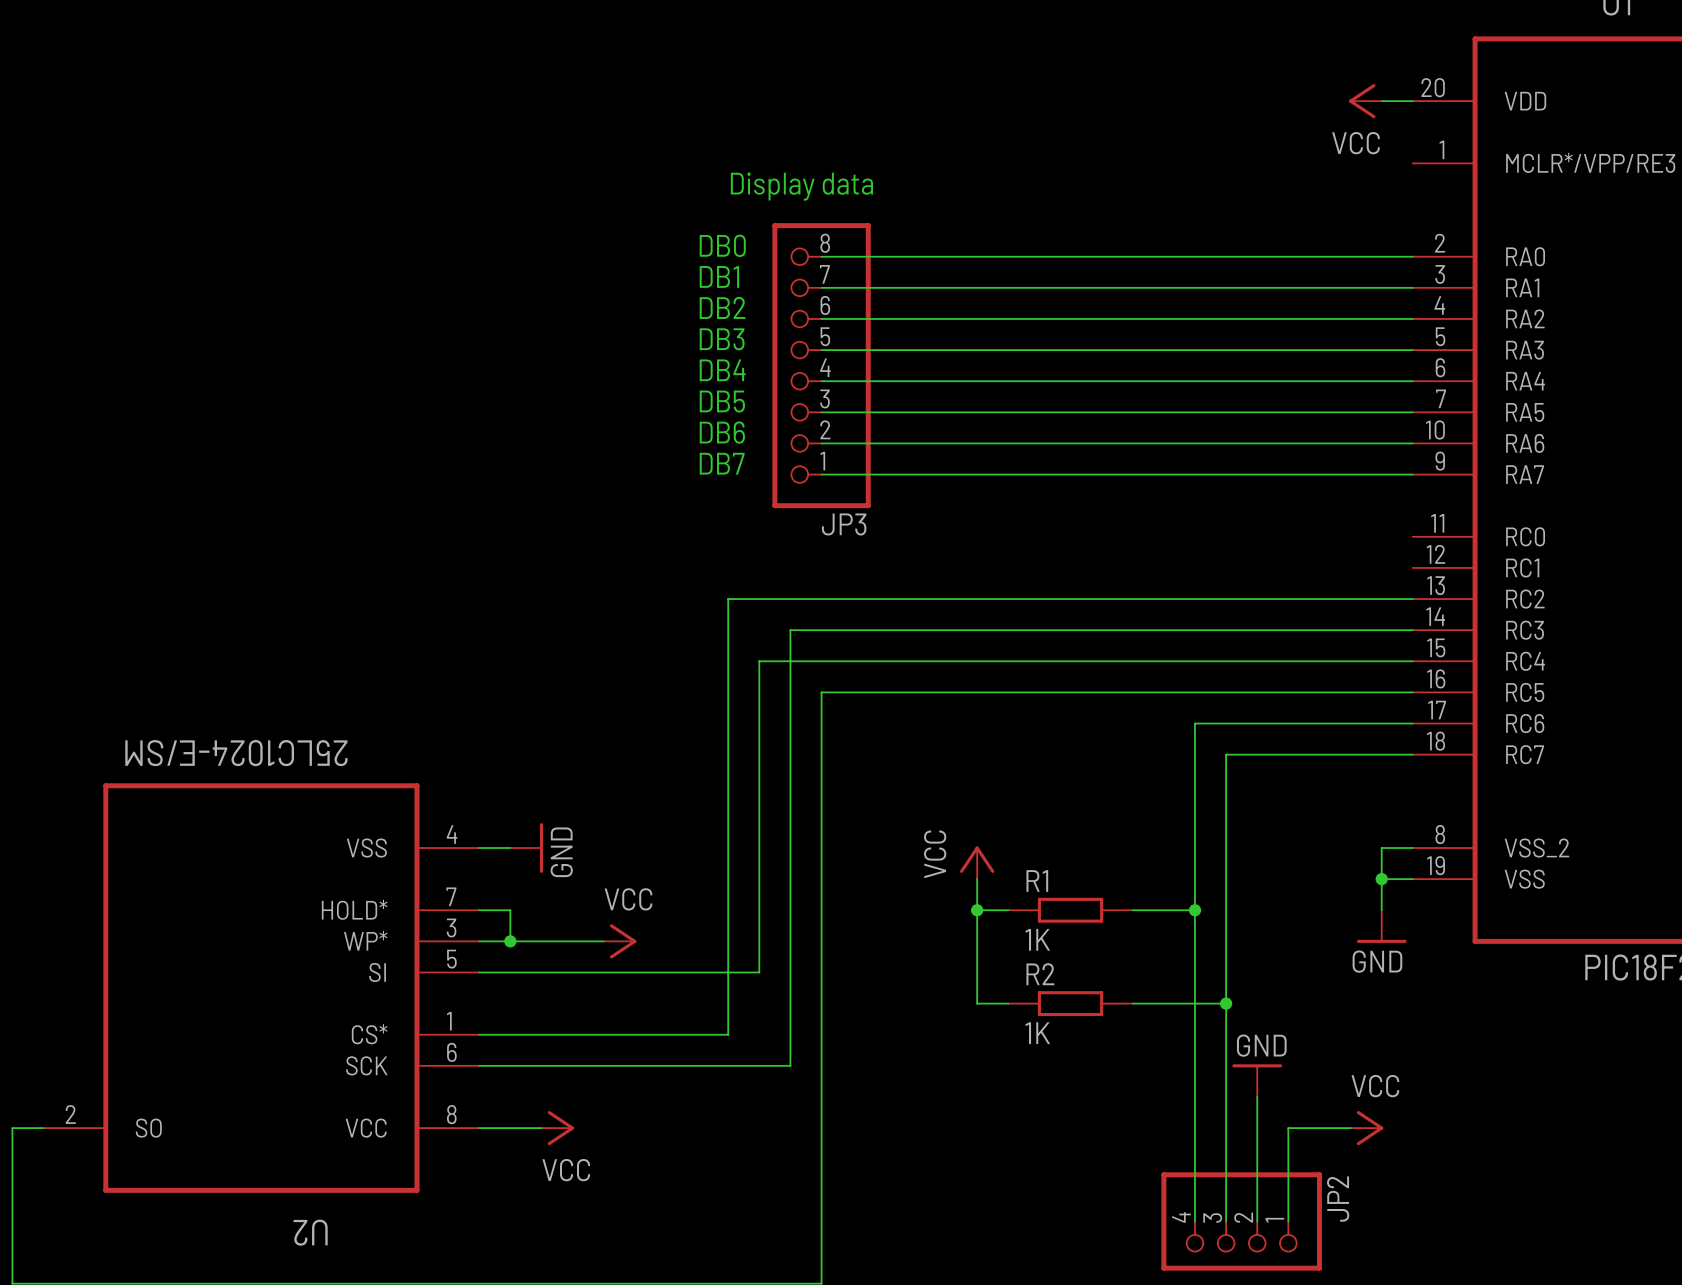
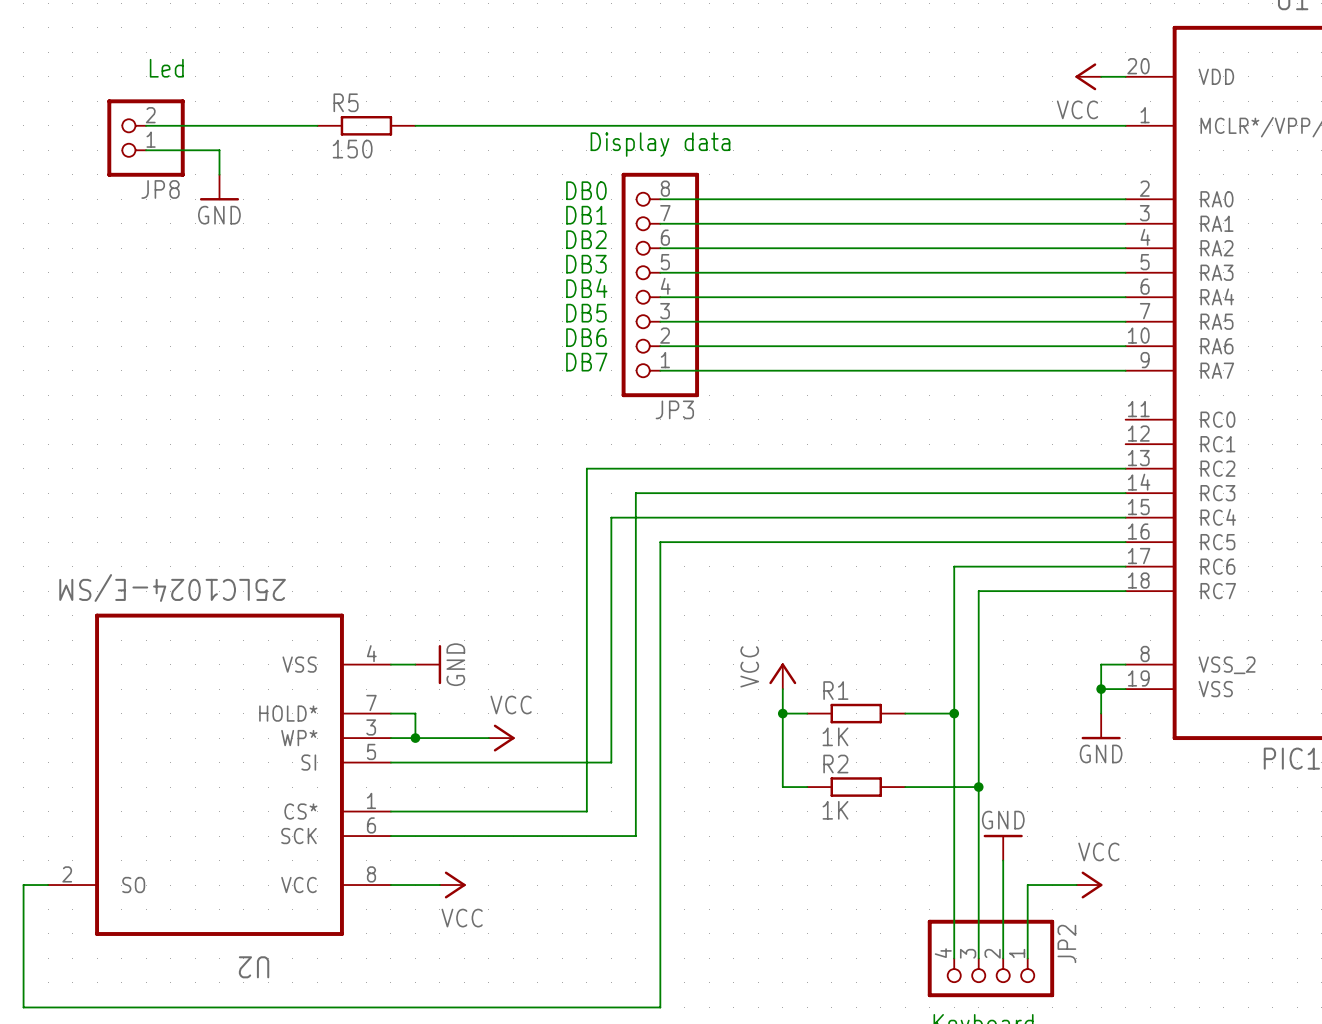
text: none -> Led (166, 68)
wire: none -> (146, 125) (317, 125)
R5: none -> 150 (366, 125)
wire: none -> (415, 125) (1125, 125)
JP8: none -> (146, 138)
wire: none -> (146, 150) (219, 150) (219, 174)
power symbol: none -> GND (219, 187)

